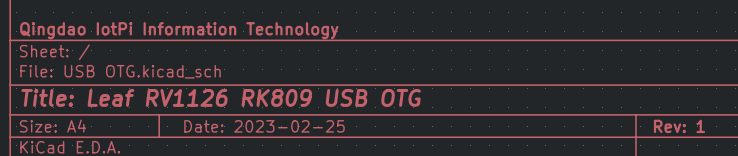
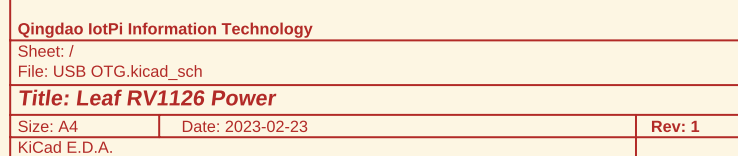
title block: Title: Leaf RV1126 RK809 USB OTG (221, 97) -> Title: Leaf RV1126 Power (147, 97)
title block: Date: 2023-02-25 (264, 126) -> Date: 2023-02-23 (245, 126)

